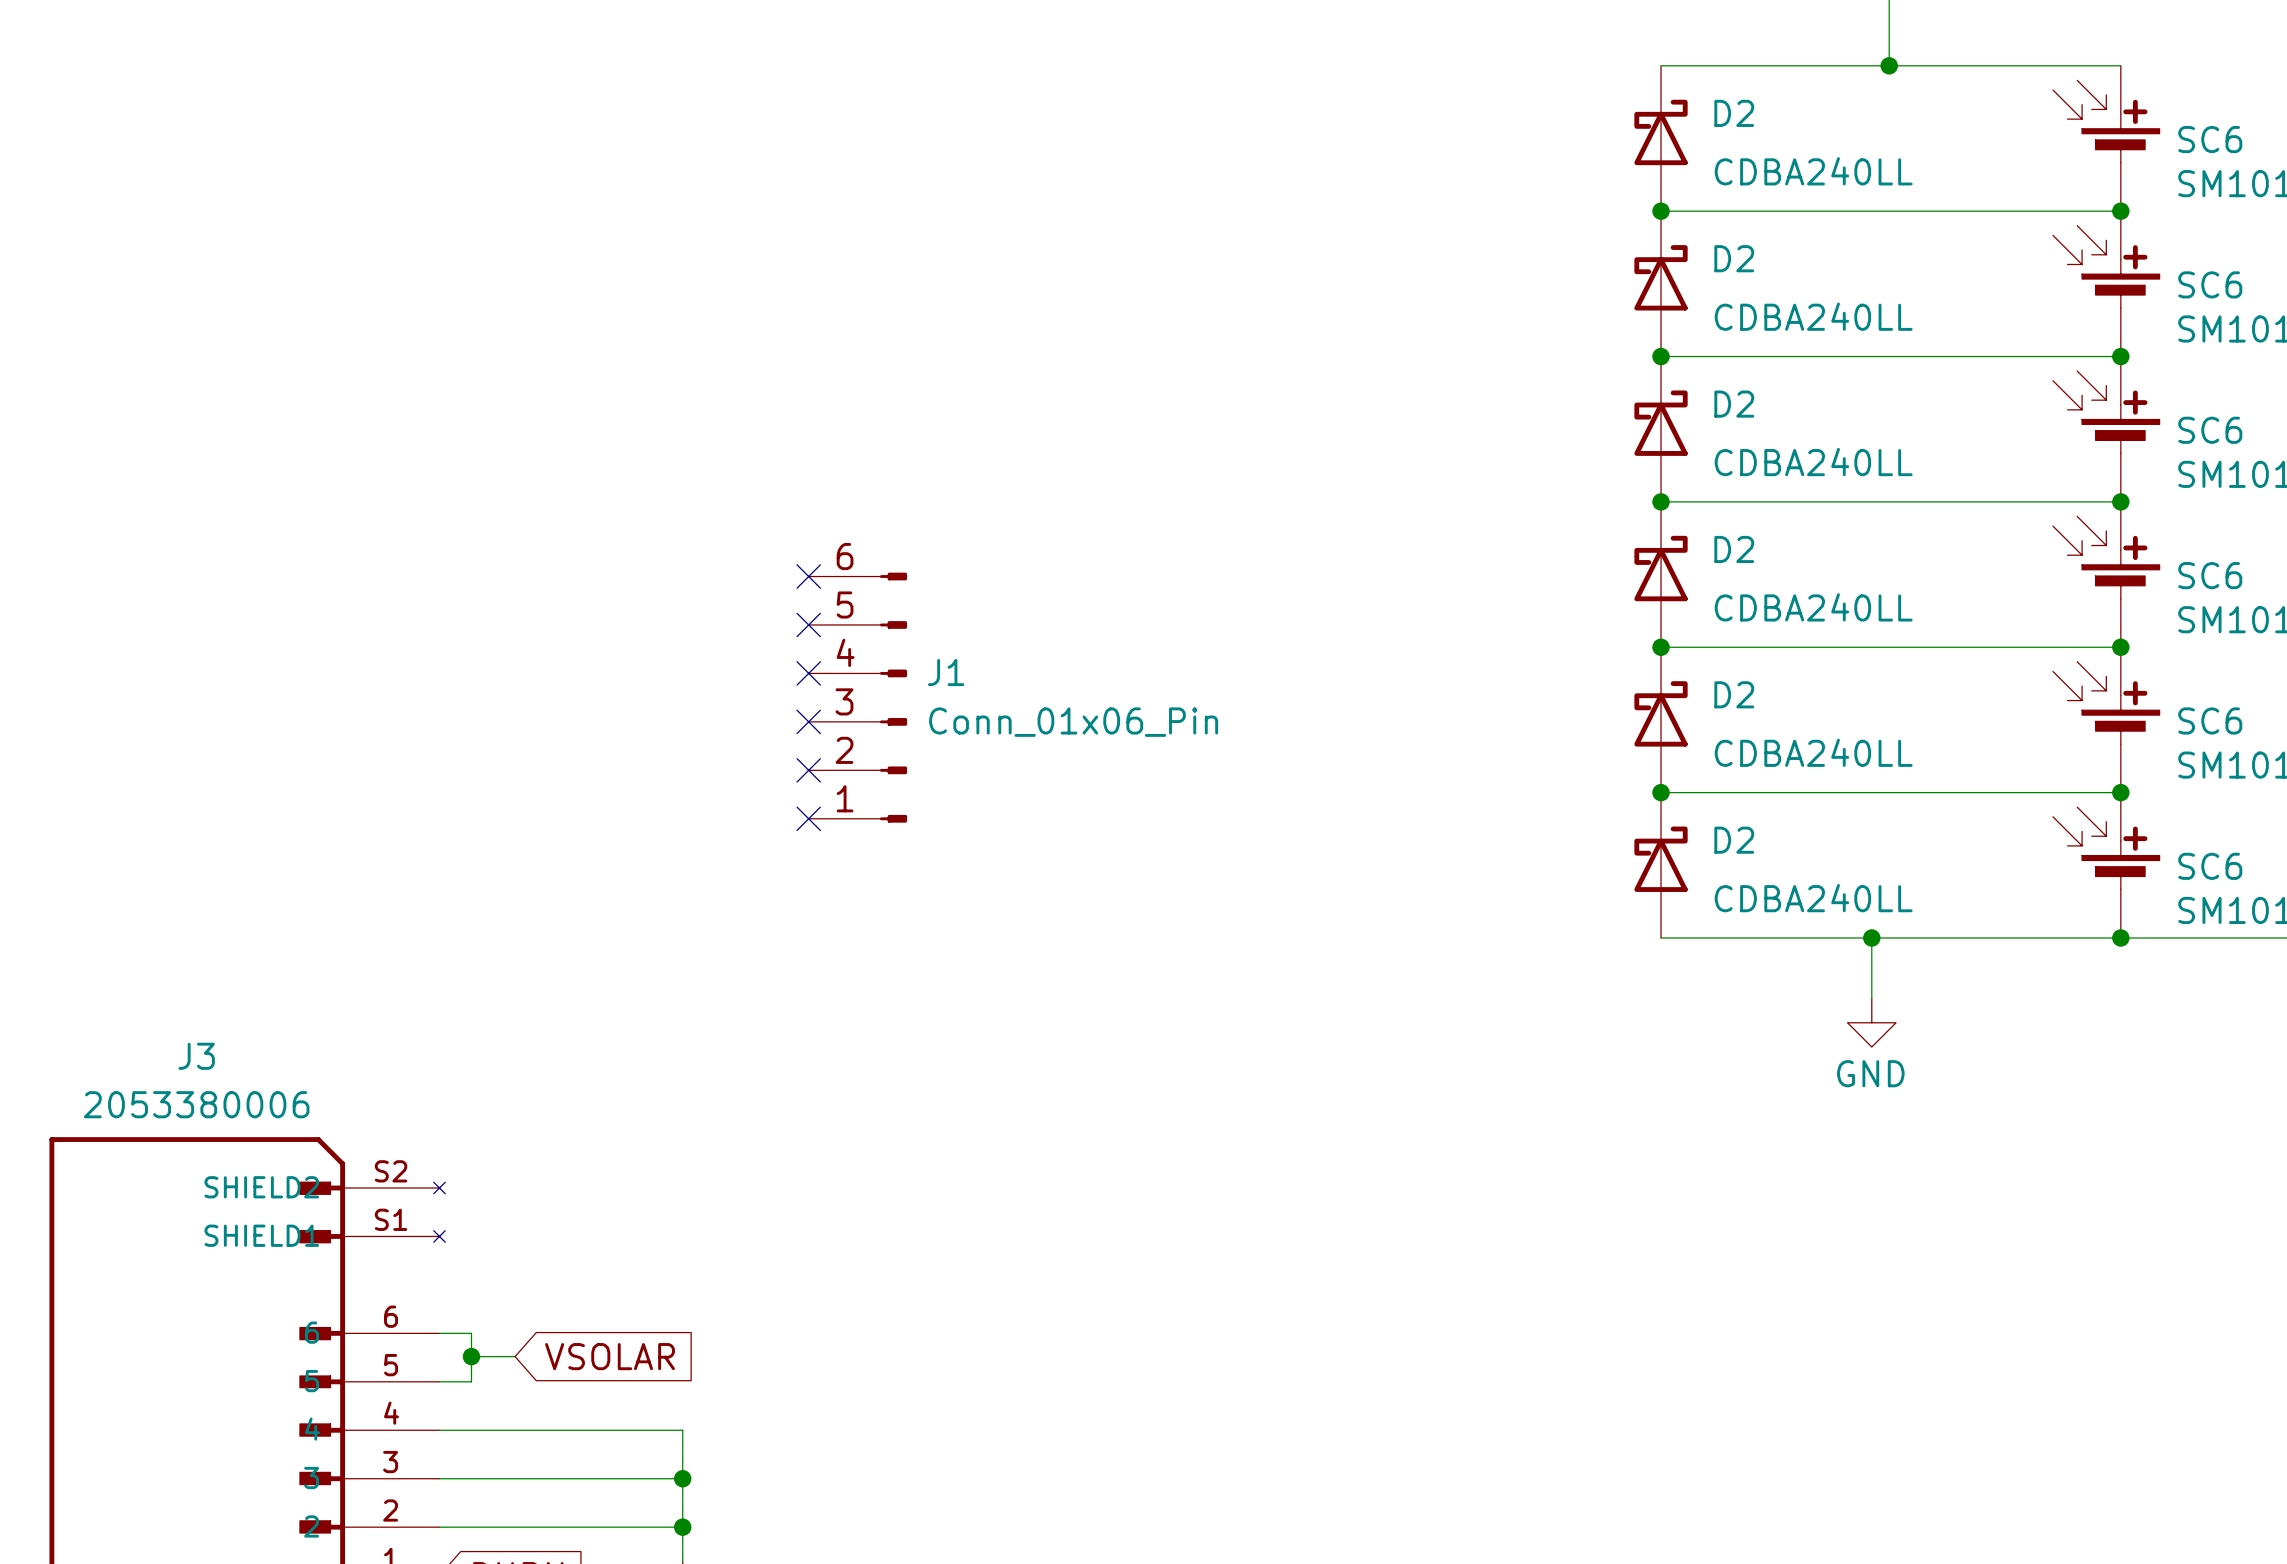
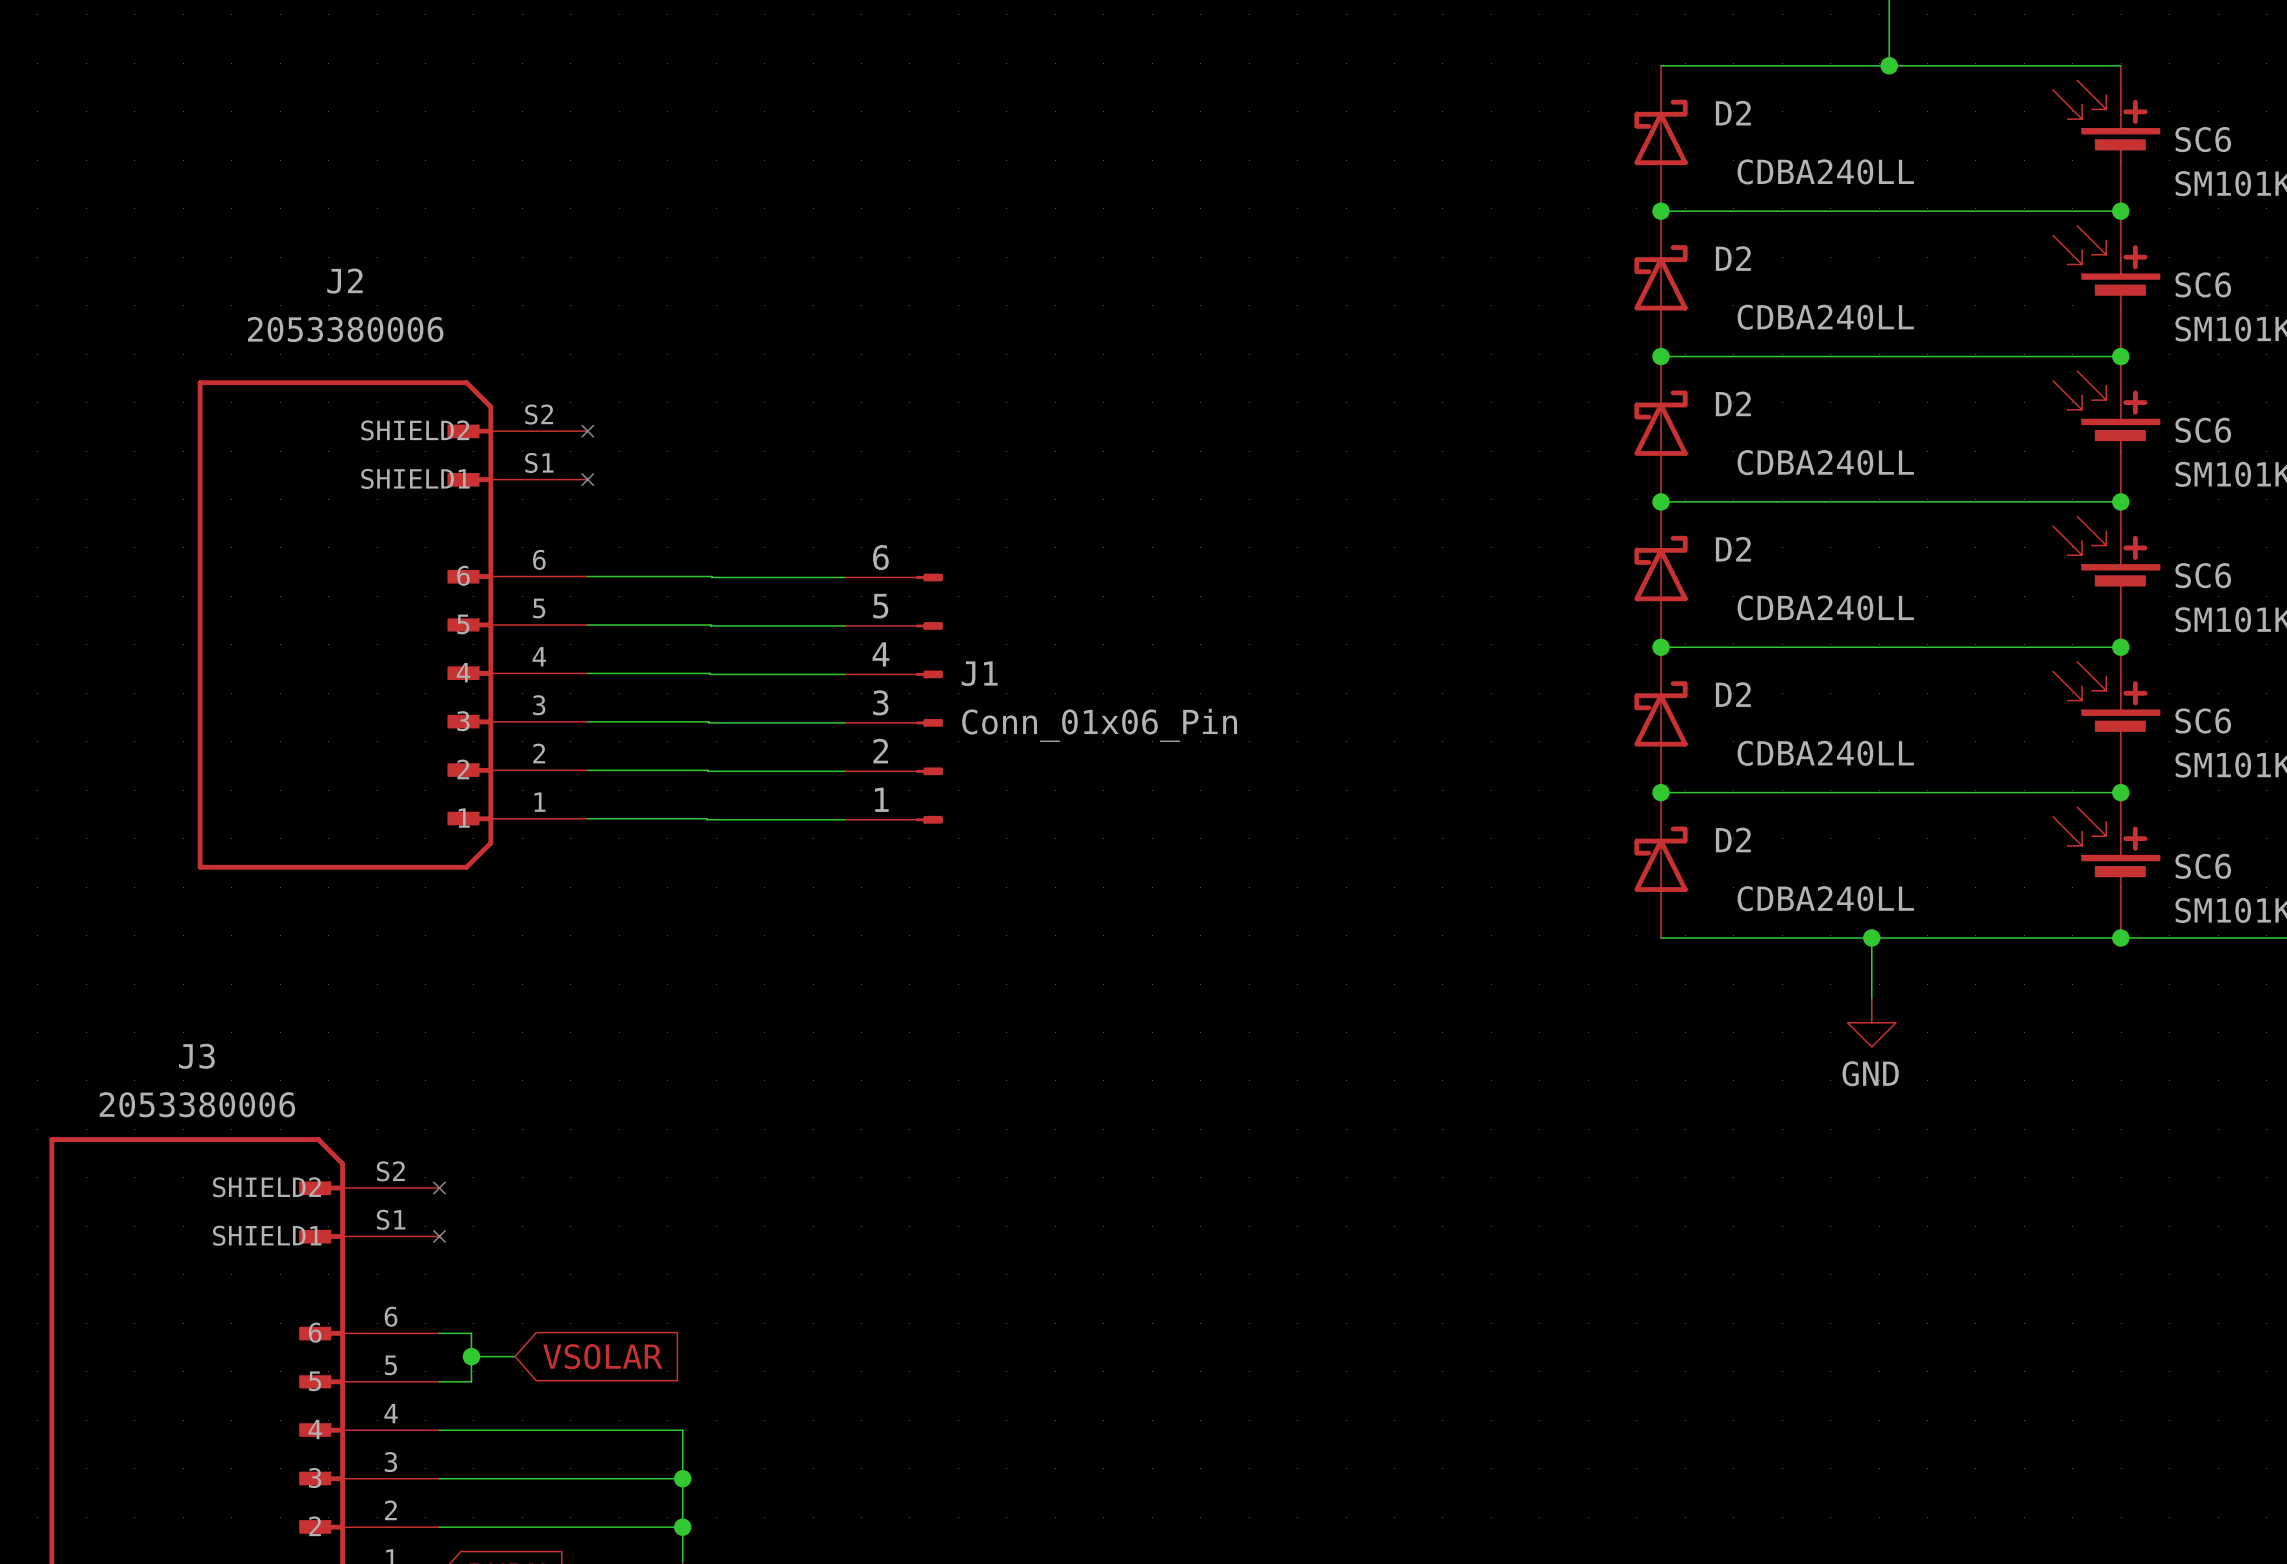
wire: none -> (587, 576) (844, 577)
no-connect mark: (808, 576) -> none
J2: none -> 2053380006 (395, 624)
wire: none -> (587, 624) (844, 625)
no-connect mark: (808, 624) -> none
wire: none -> (587, 673) (844, 674)
no-connect mark: (808, 673) -> none
J1 position: (857, 697) -> (893, 698)
wire: none -> (587, 721) (844, 722)
no-connect mark: (808, 721) -> none
wire: none -> (587, 770) (844, 771)
no-connect mark: (808, 770) -> none
wire: none -> (587, 818) (844, 819)
no-connect mark: (808, 818) -> none

